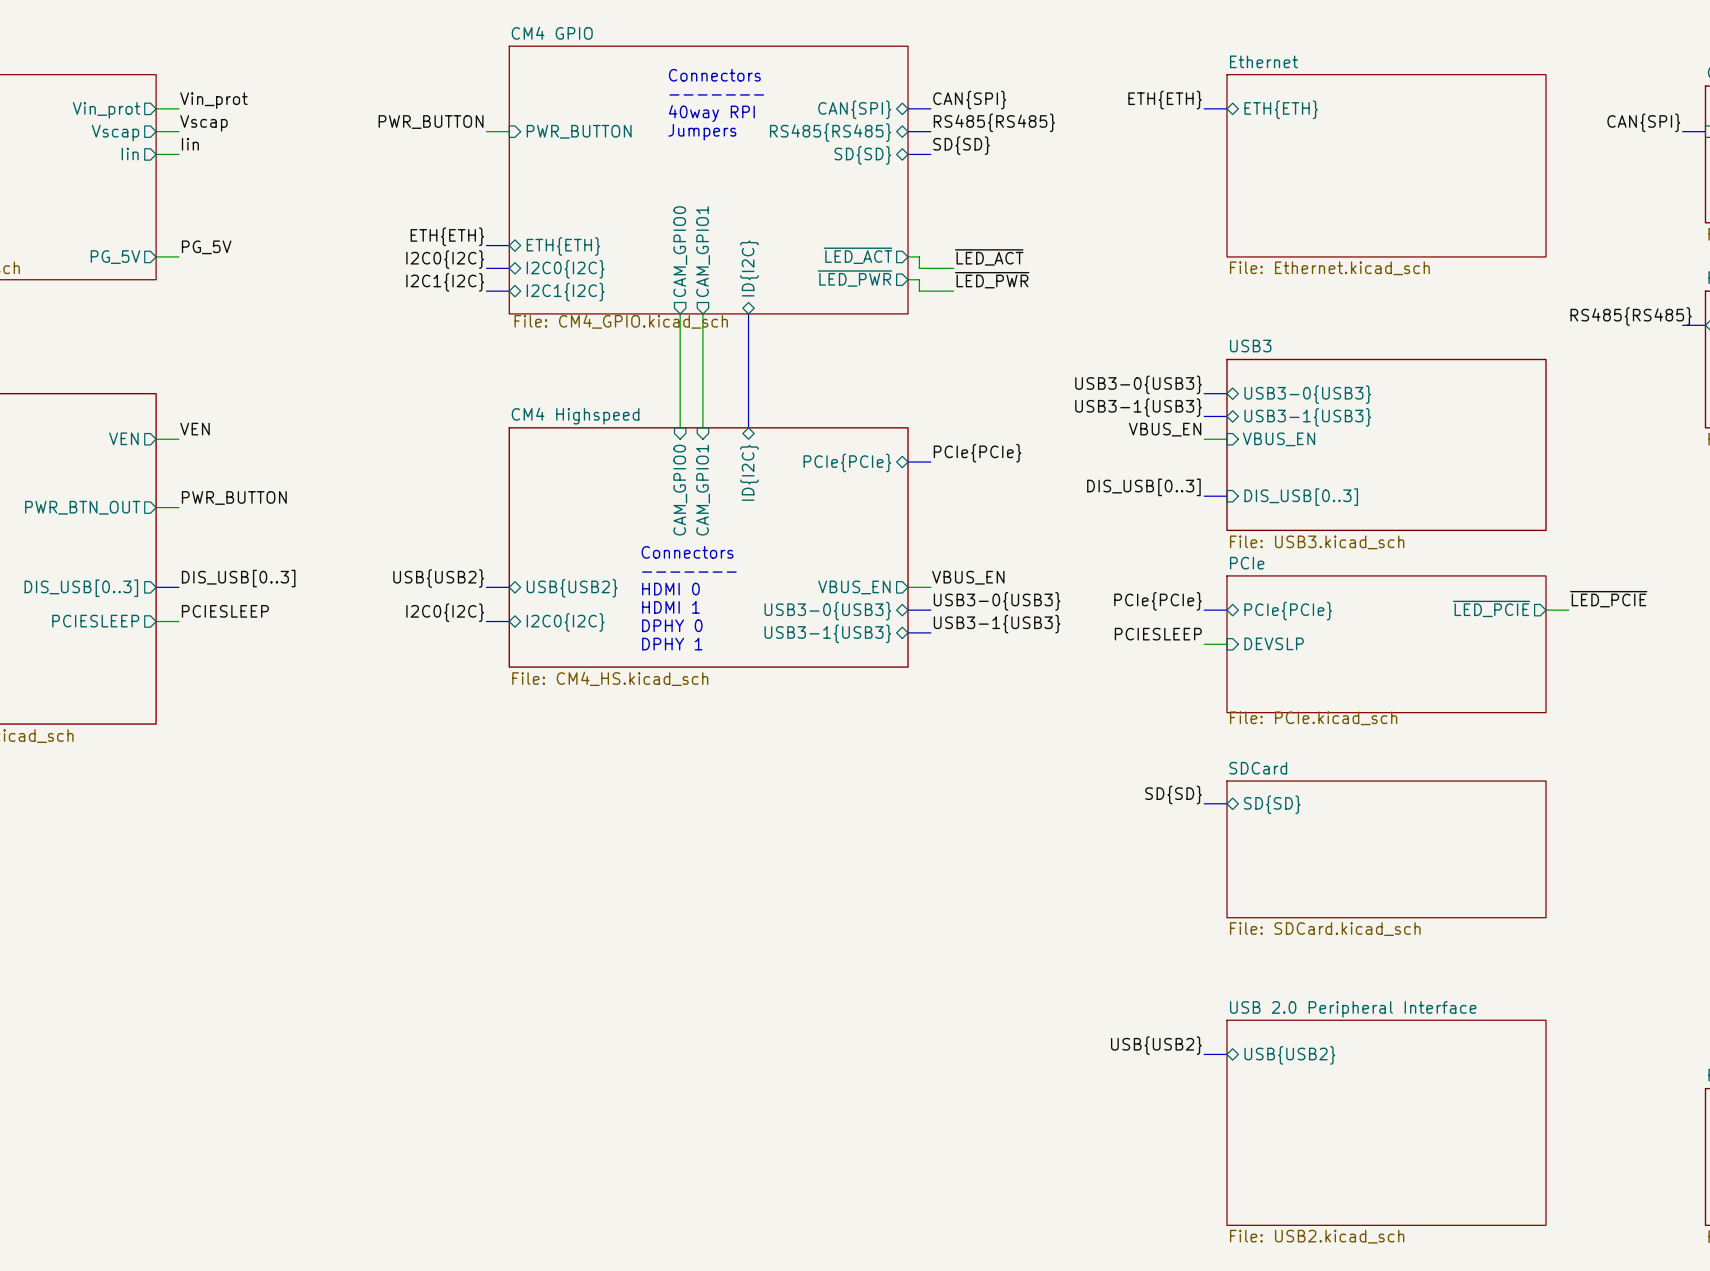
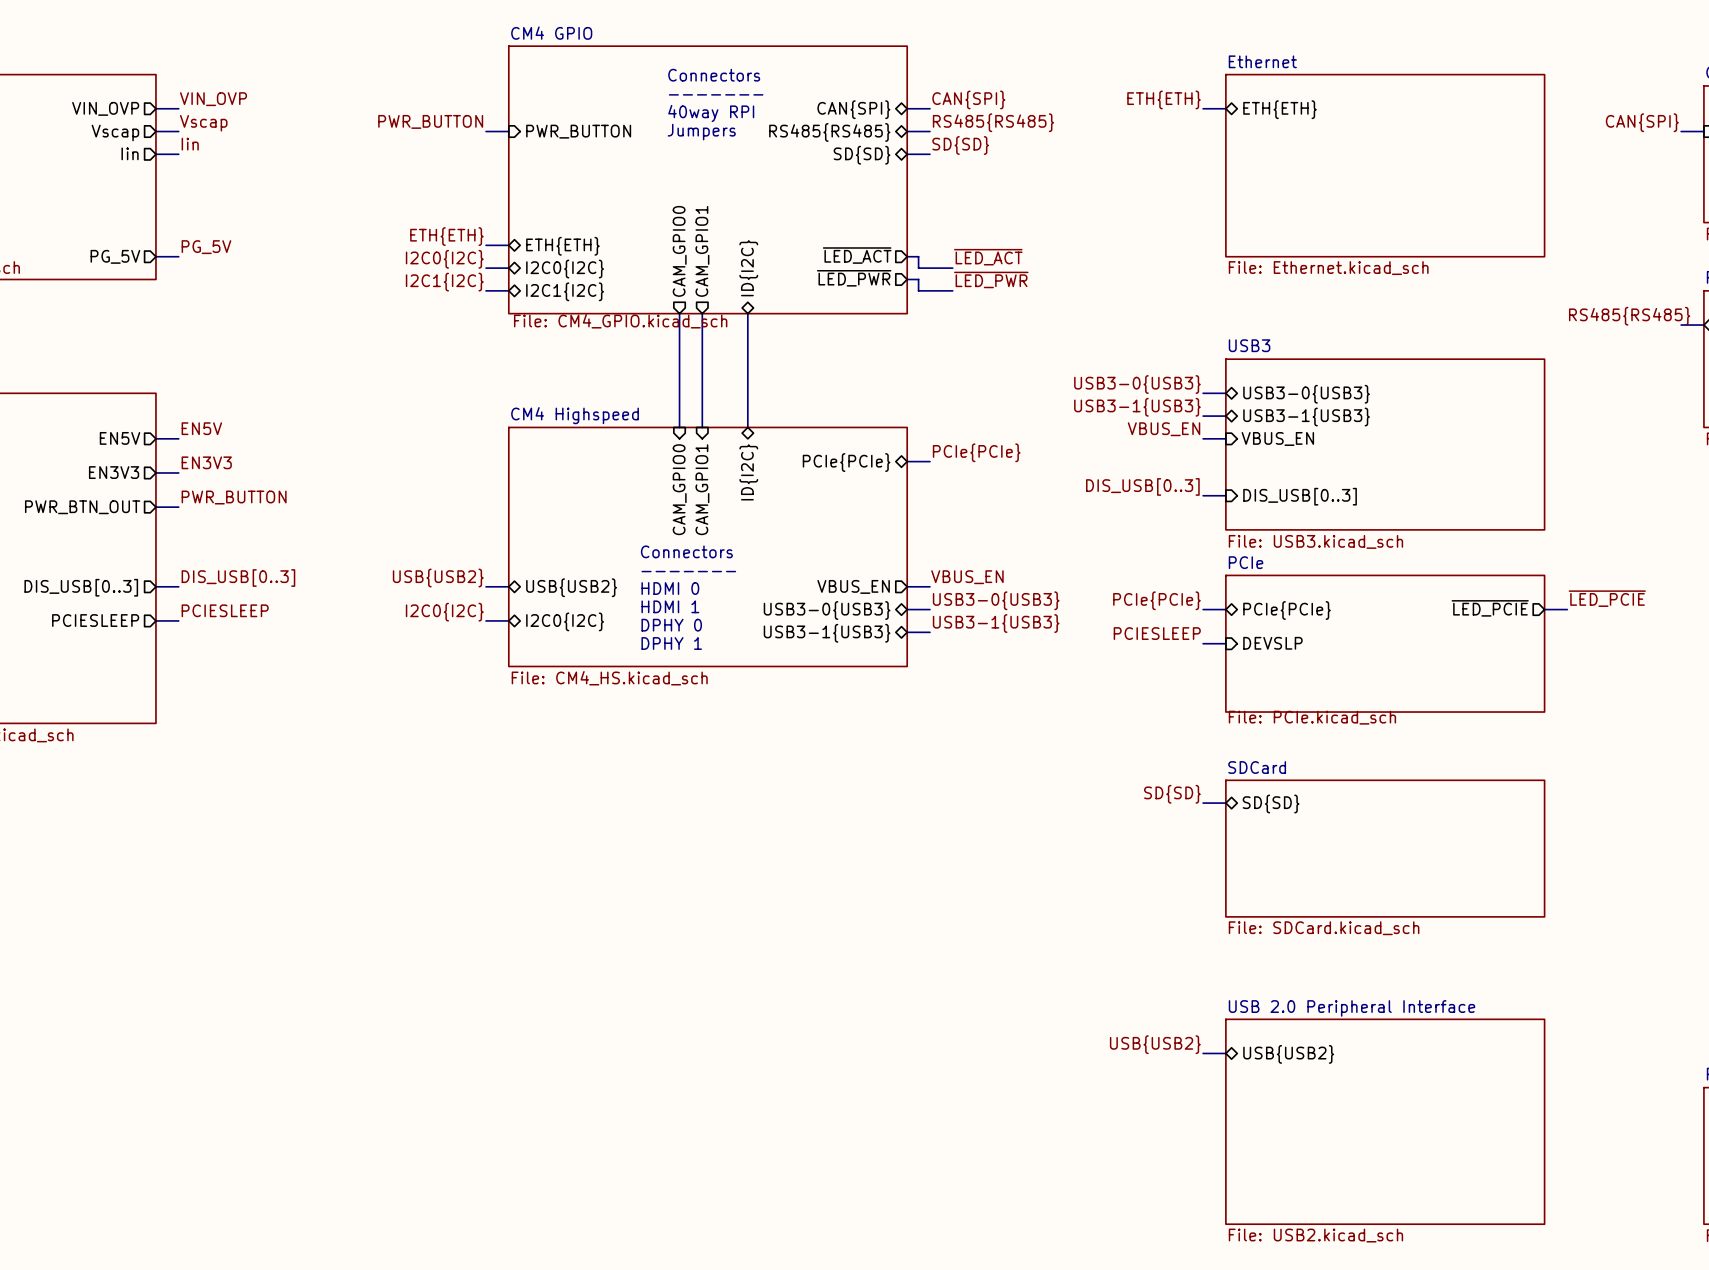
label: Vin_prot (213, 100) -> VIN_OVP (213, 99)
sheet pin: Vin_prot (106, 110) -> VIN_OVP (105, 108)
label: VEN (194, 429) -> EN5V (201, 428)
sheet pin: VEN (123, 438) -> EN5V (120, 438)
label: none -> EN3V3 (206, 462)
sheet pin: none -> EN3V3 (114, 472)
wire: none -> (155, 472) (178, 472)

